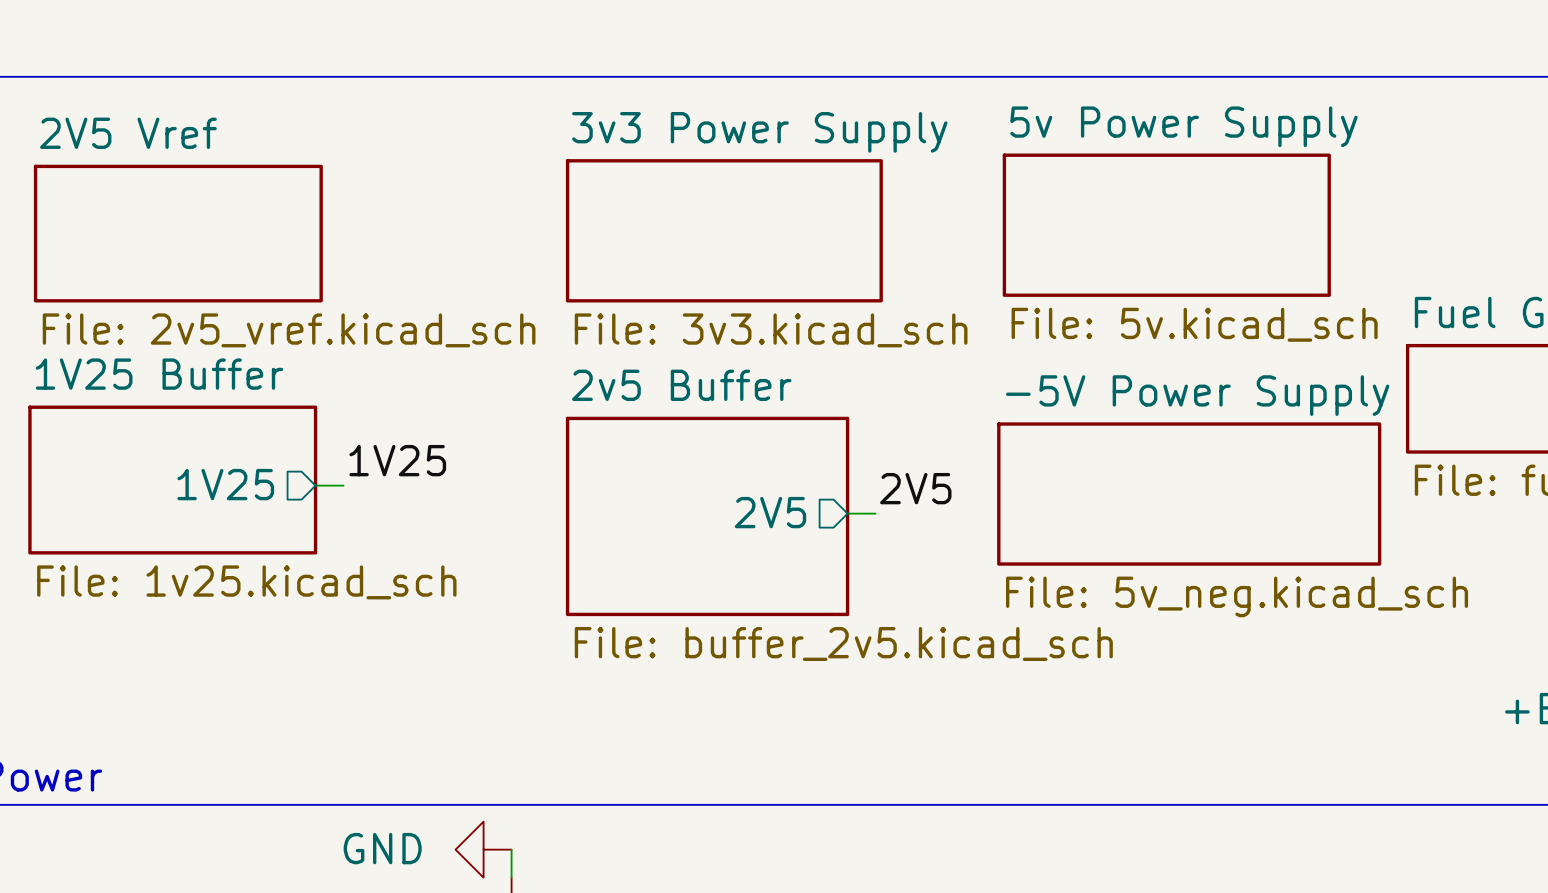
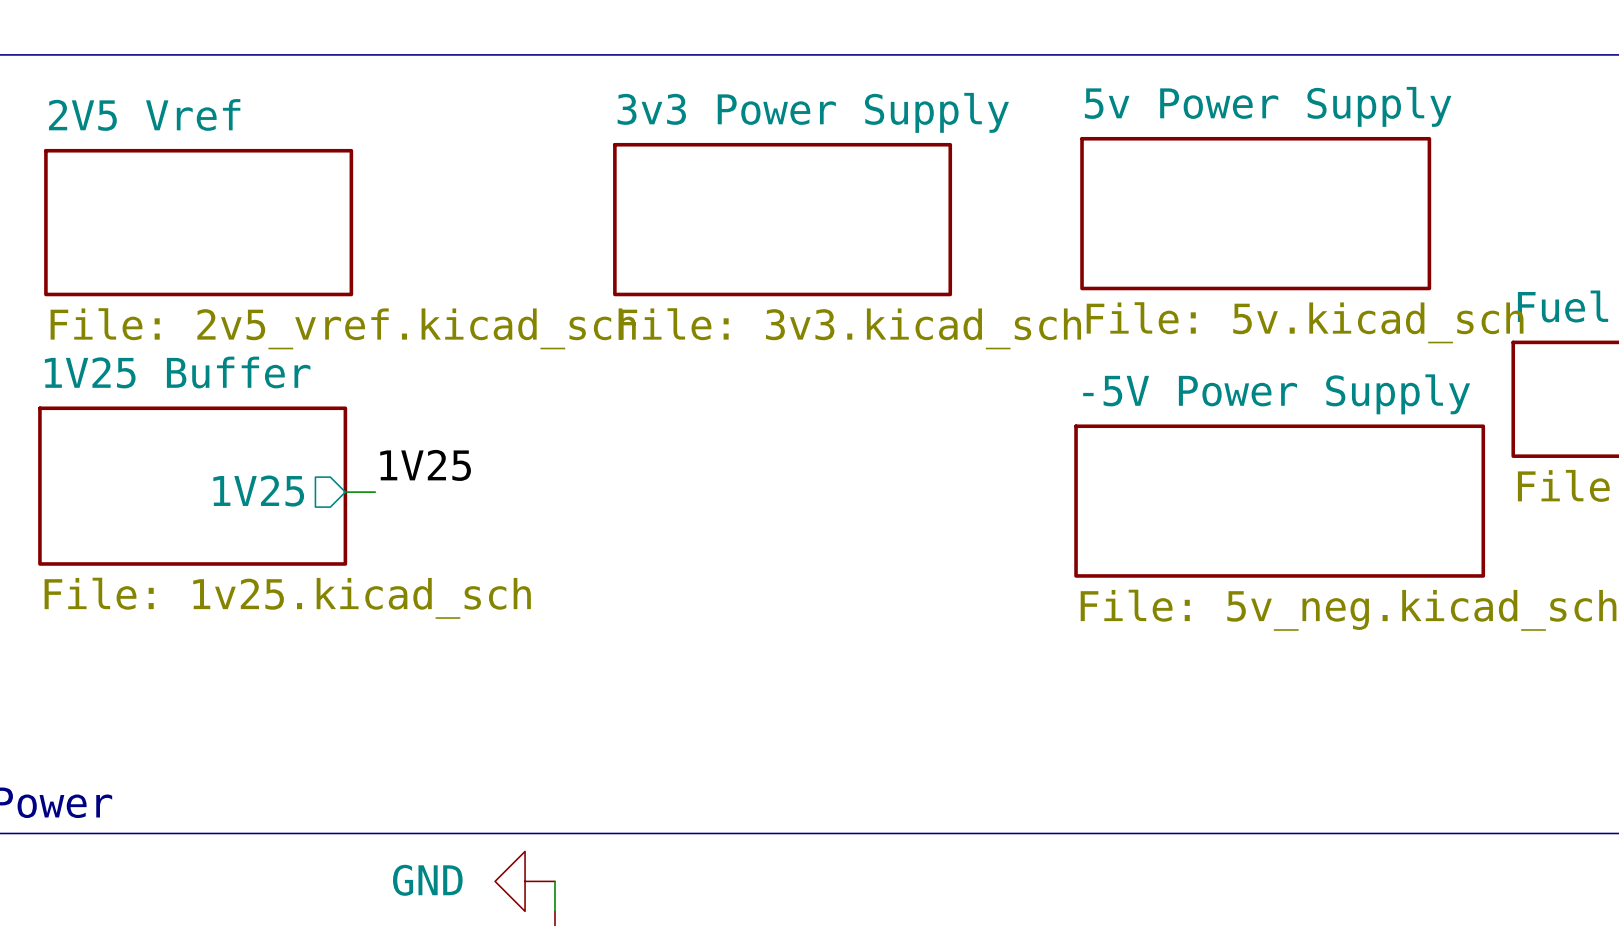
label: 2V5 (915, 488) -> none
sheet pin: 2V5 (770, 512) -> none
wire: (847, 513) (875, 513) -> none
sheet 2v5 Buffer: File: buffer_2v5.kicad_sch (707, 516) -> none

